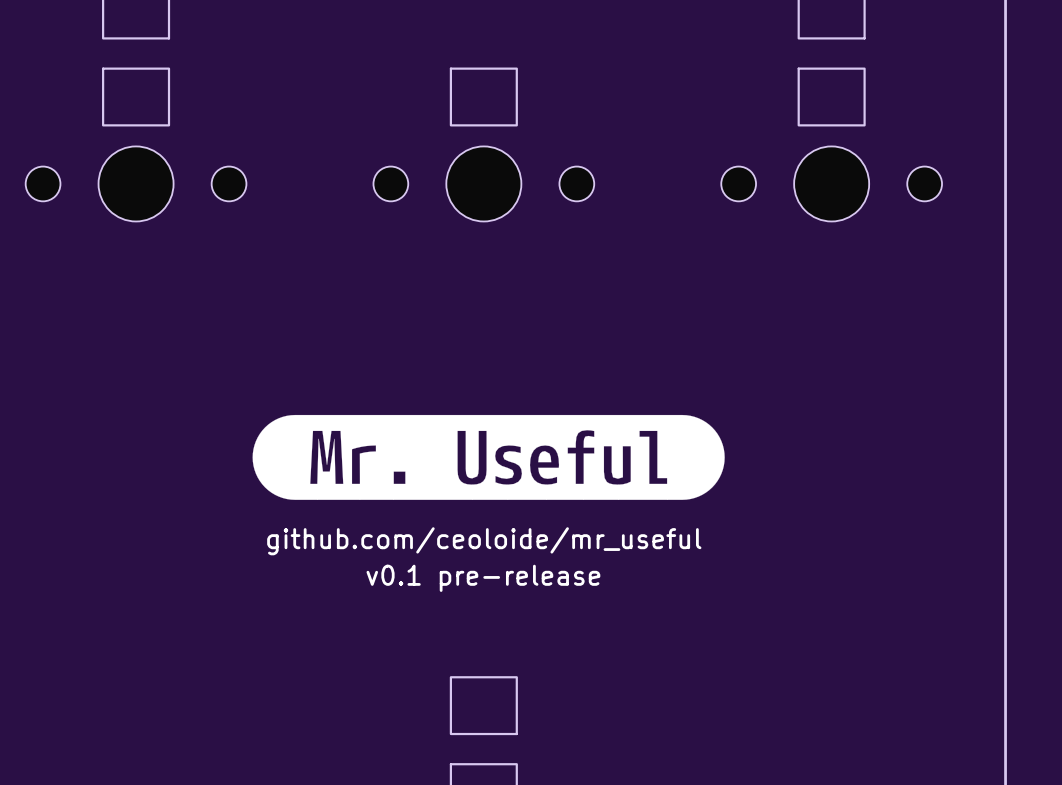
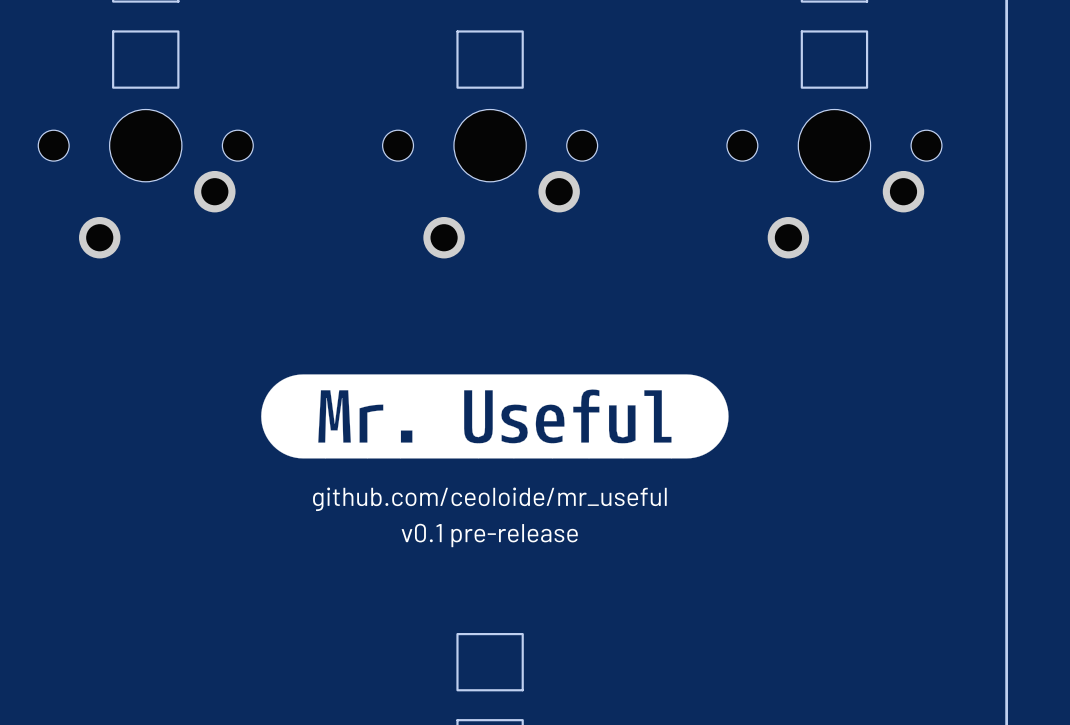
part: (136, 183) -> none
part: (483, 183) -> none
part: (831, 183) -> none
part: none -> (145, 183)
part: none -> (490, 183)
part: none -> (834, 183)

